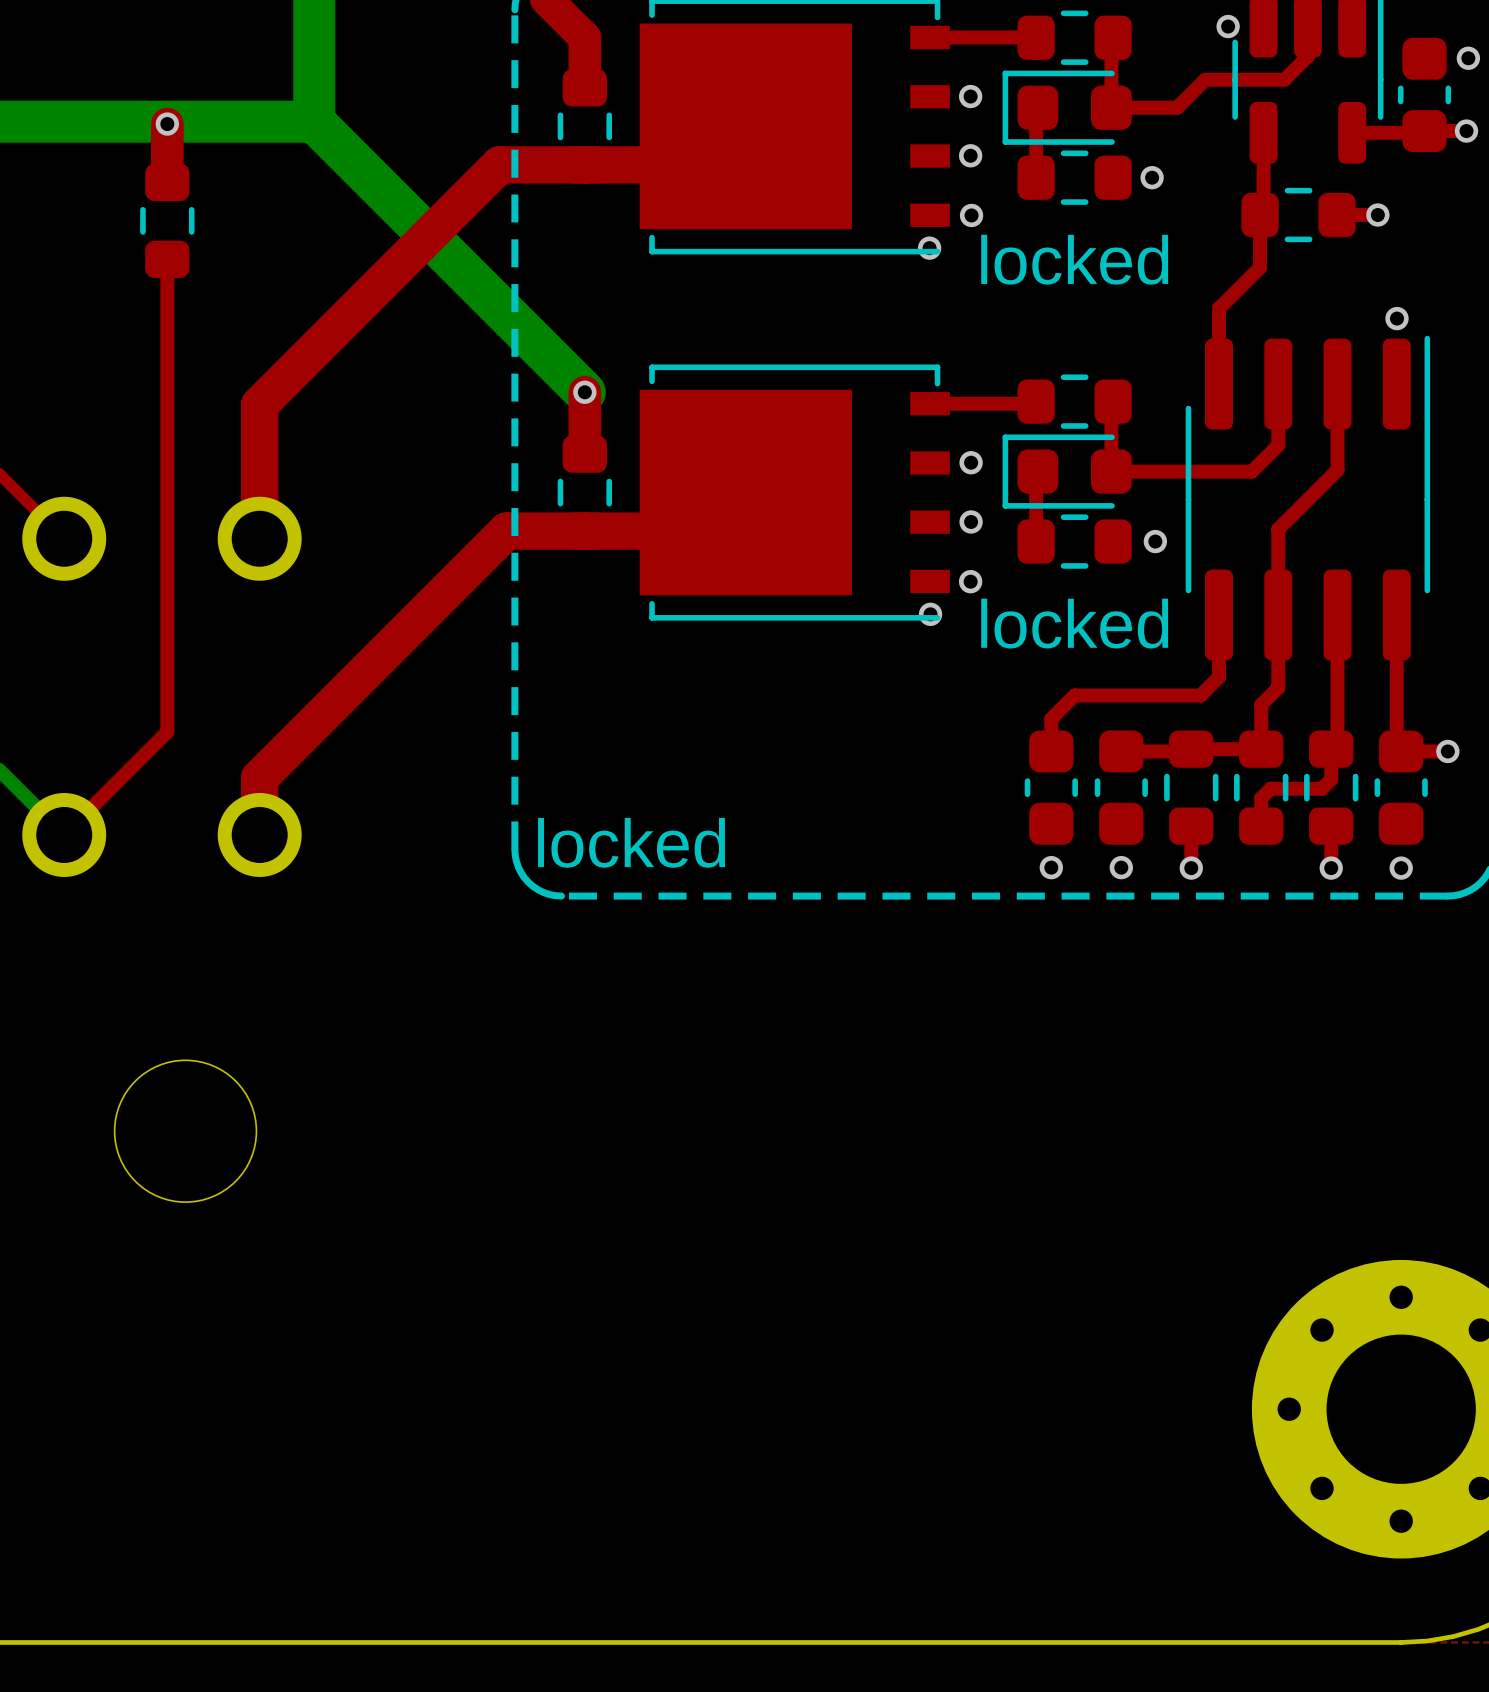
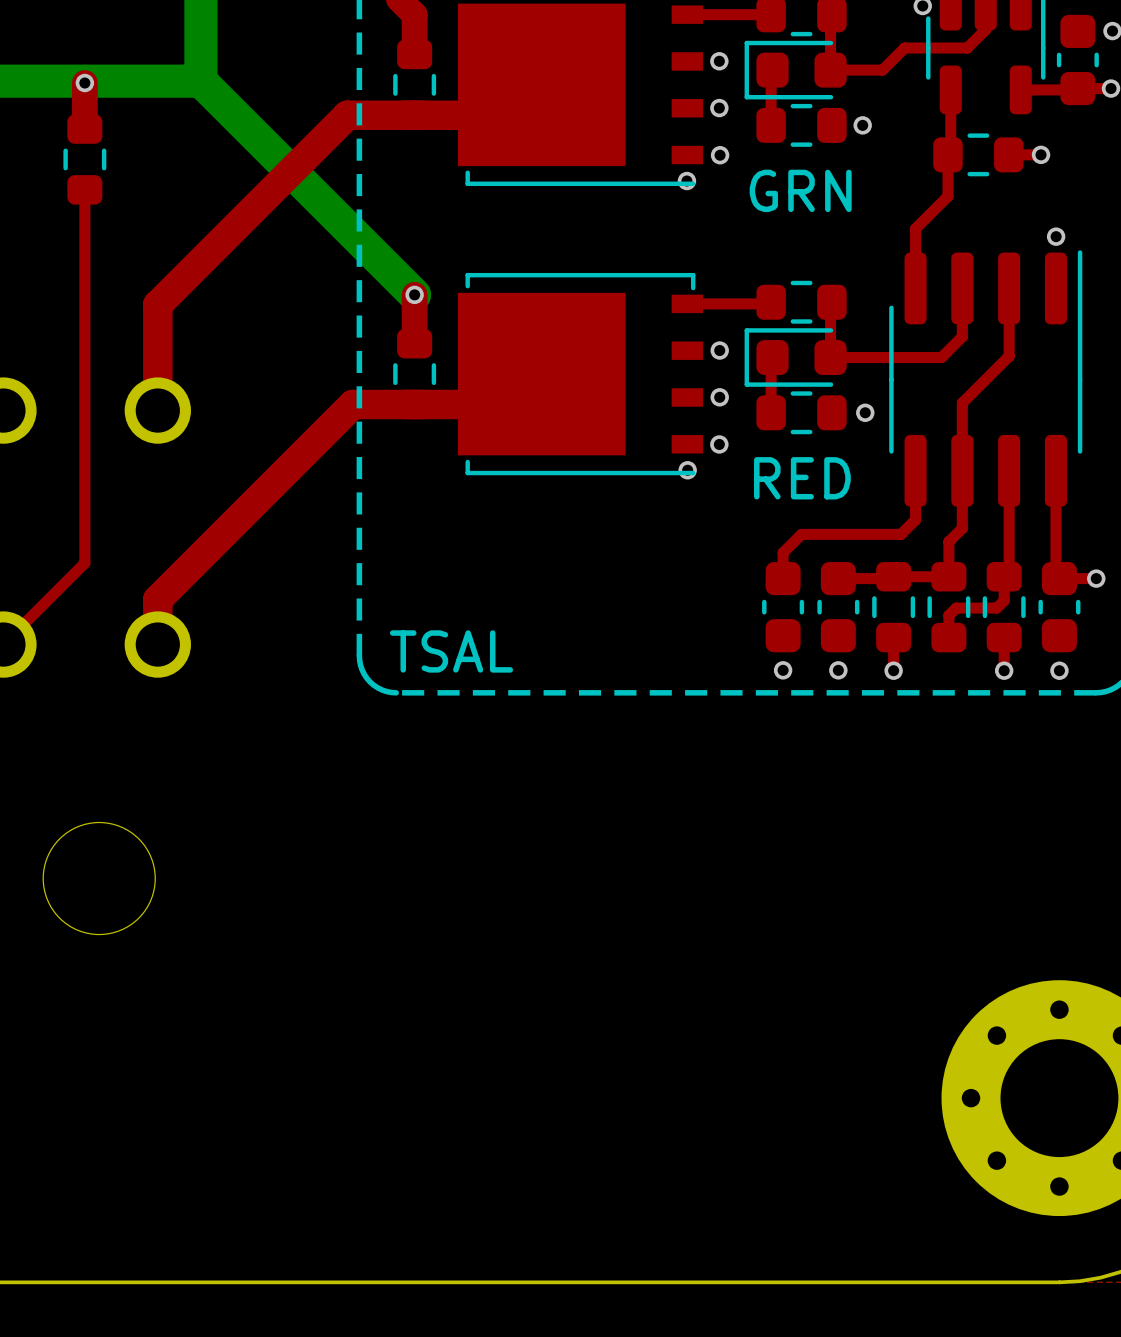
text: locked (1074, 259) -> GRN (800, 190)
text: locked (1074, 623) -> RED (802, 478)
text: locked (631, 842) -> TSAL (451, 651)

